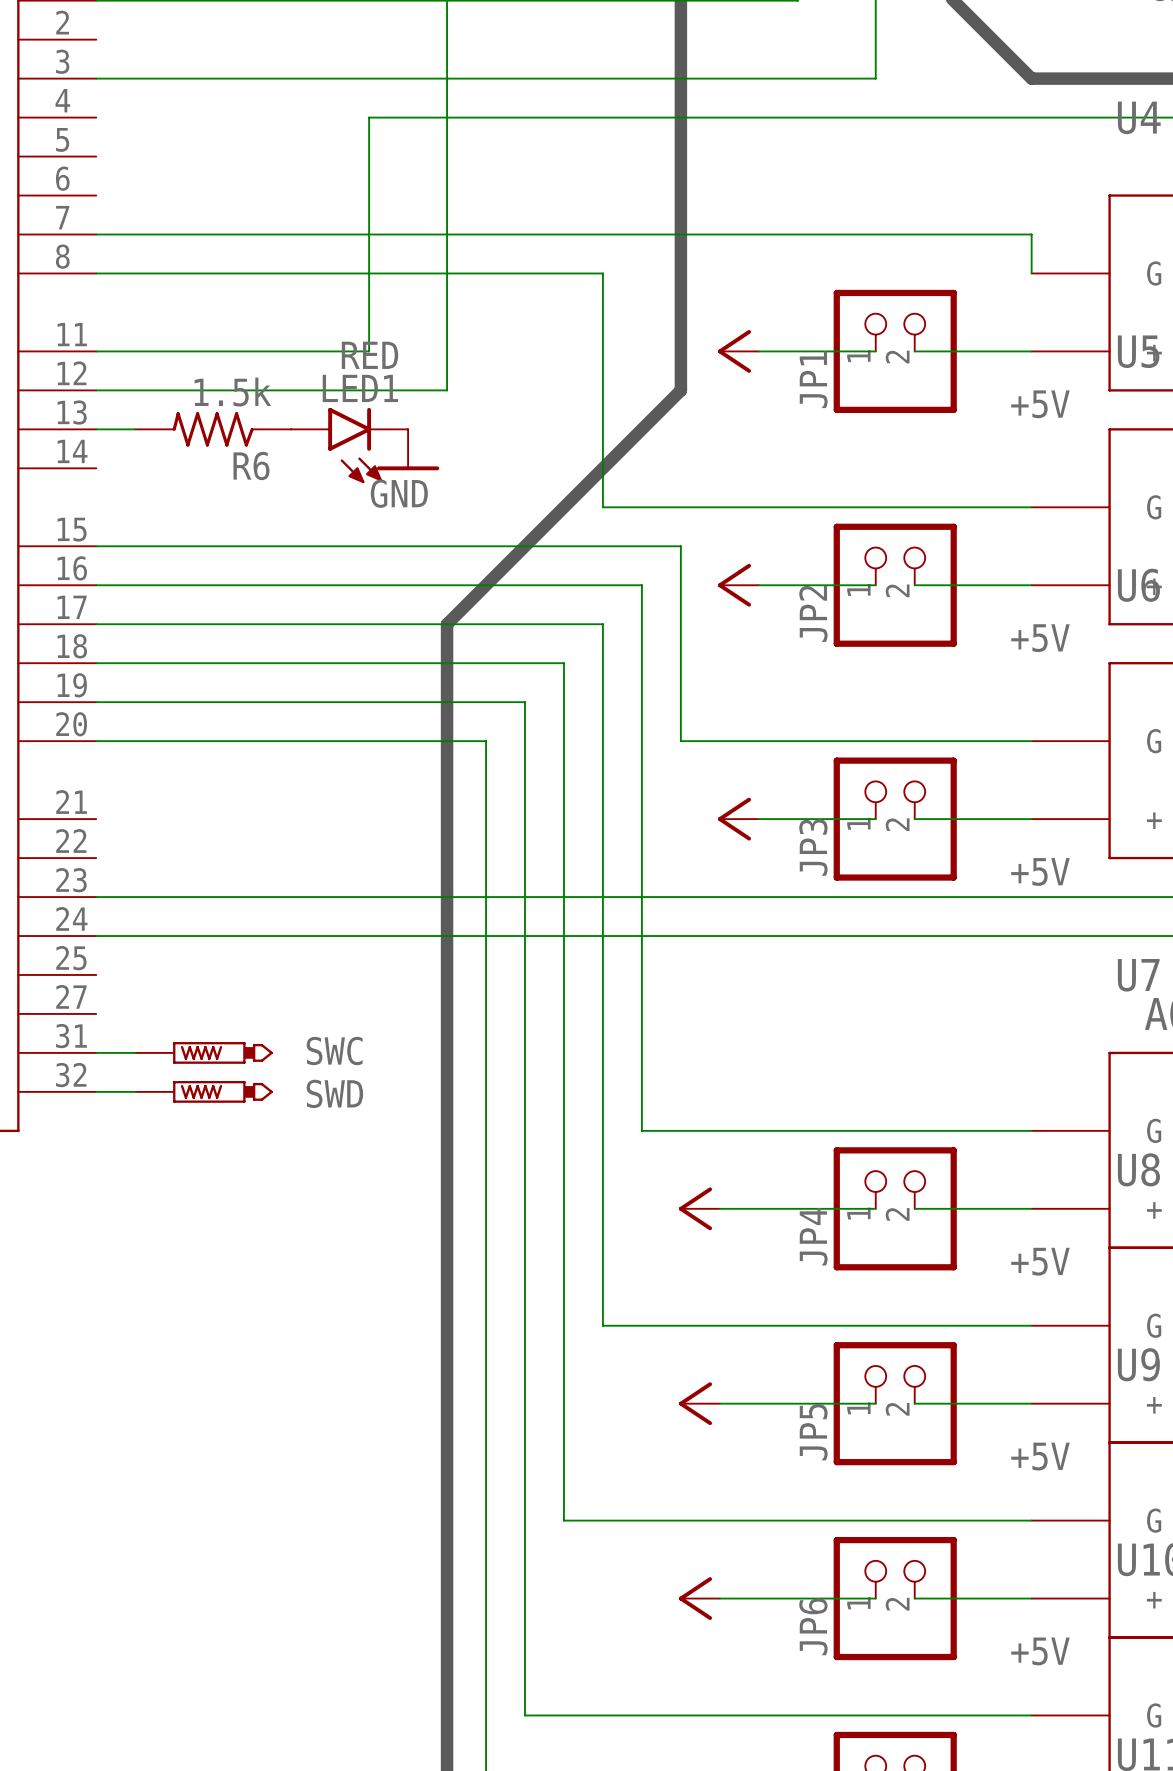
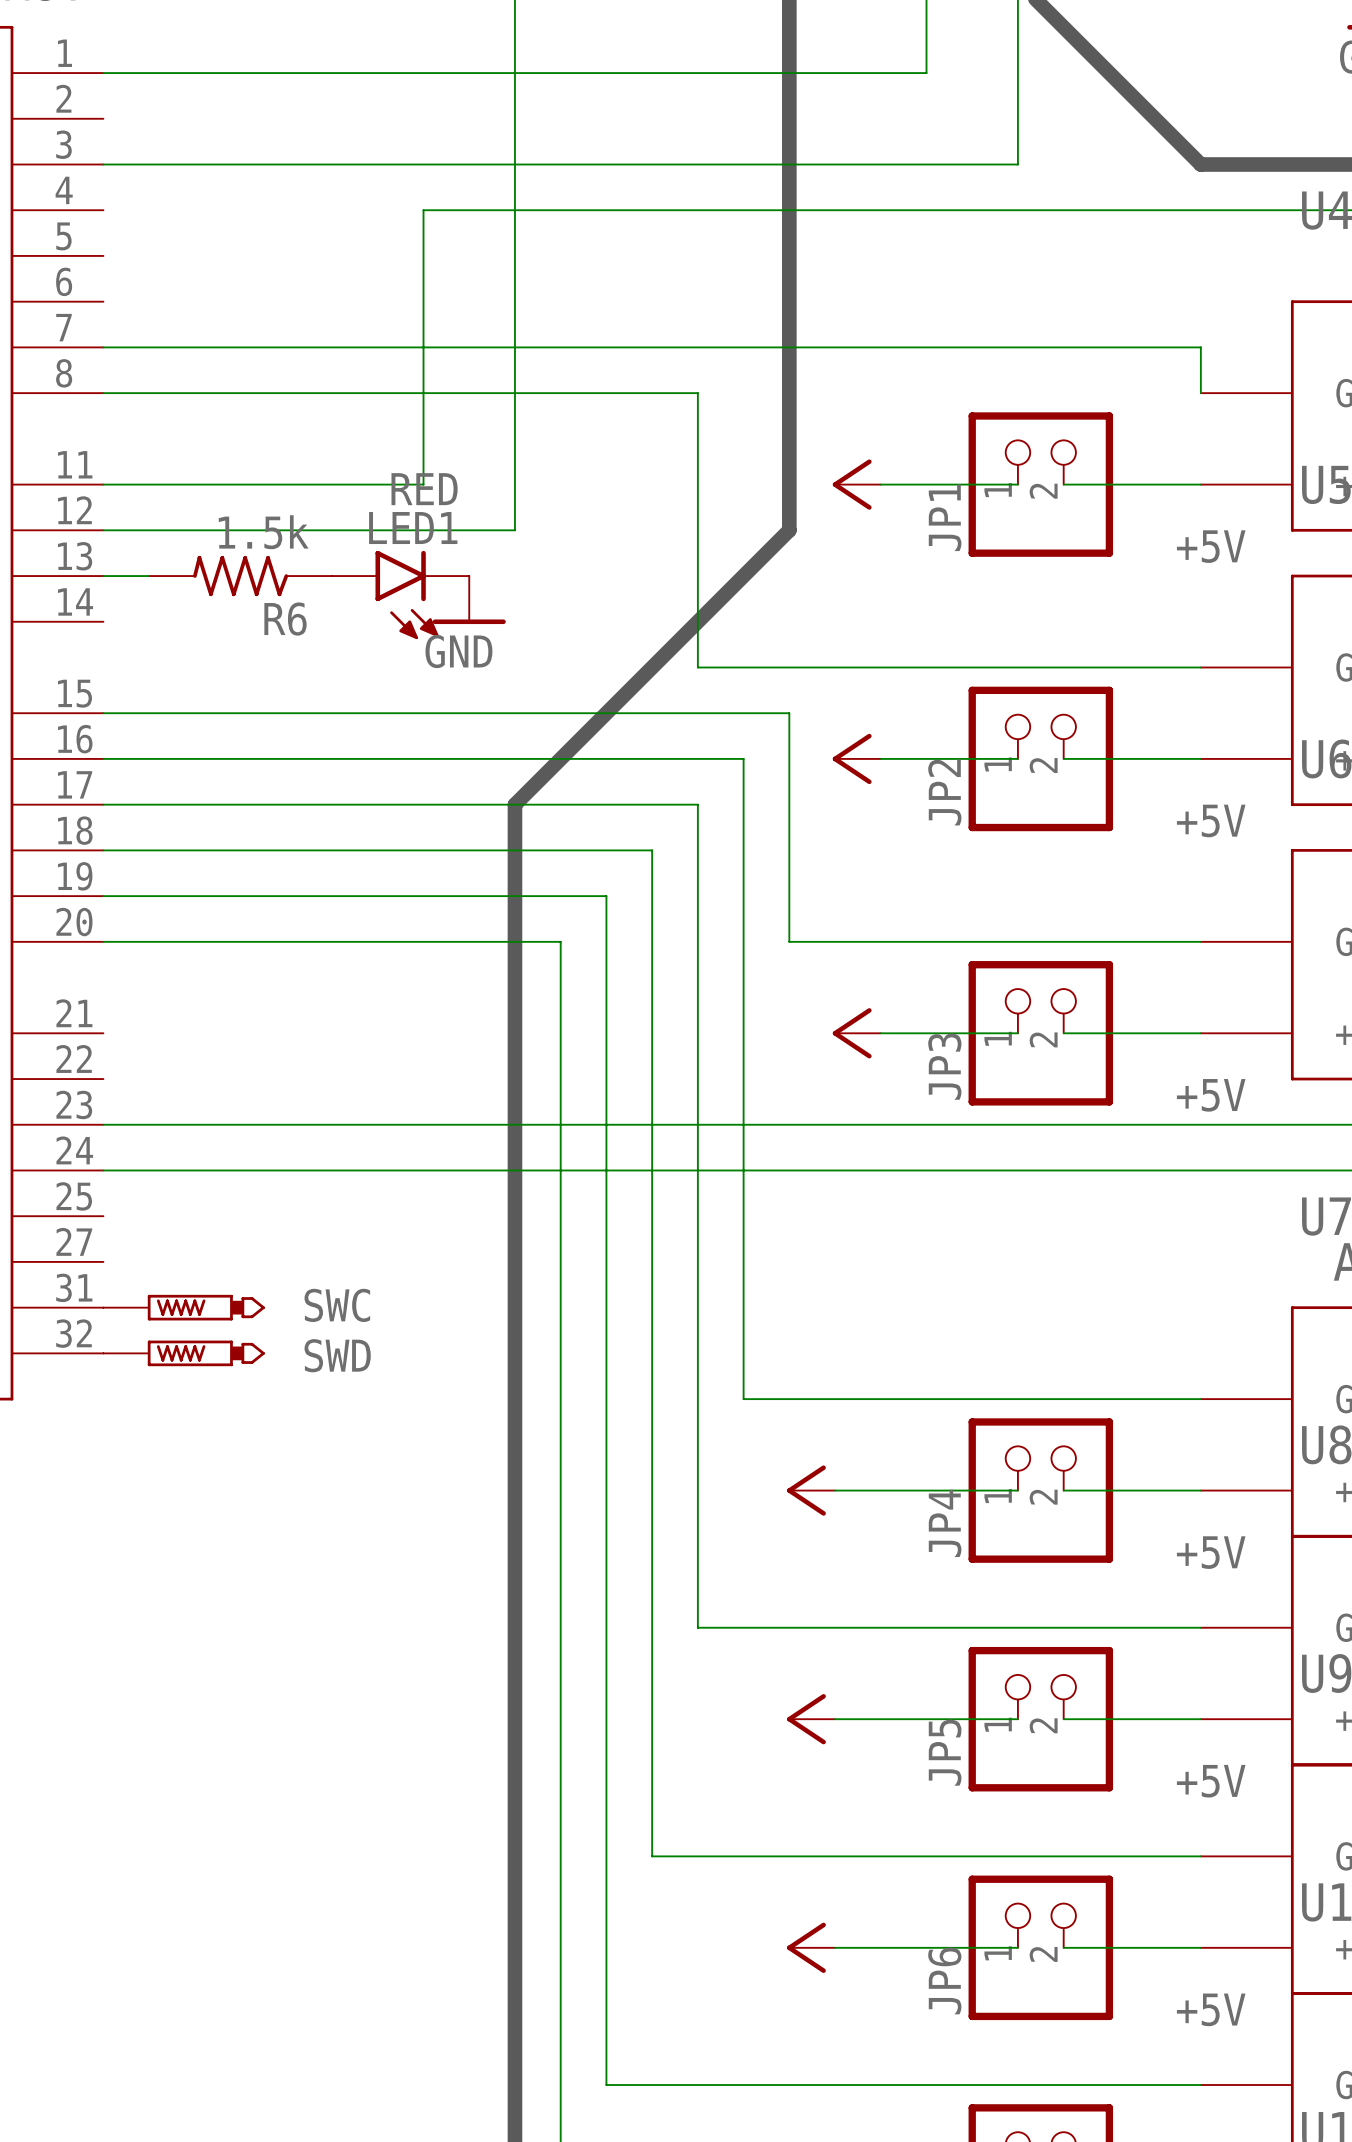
SWC position: (204, 1052) -> (184, 1307)
SWD position: (204, 1091) -> (184, 1353)

